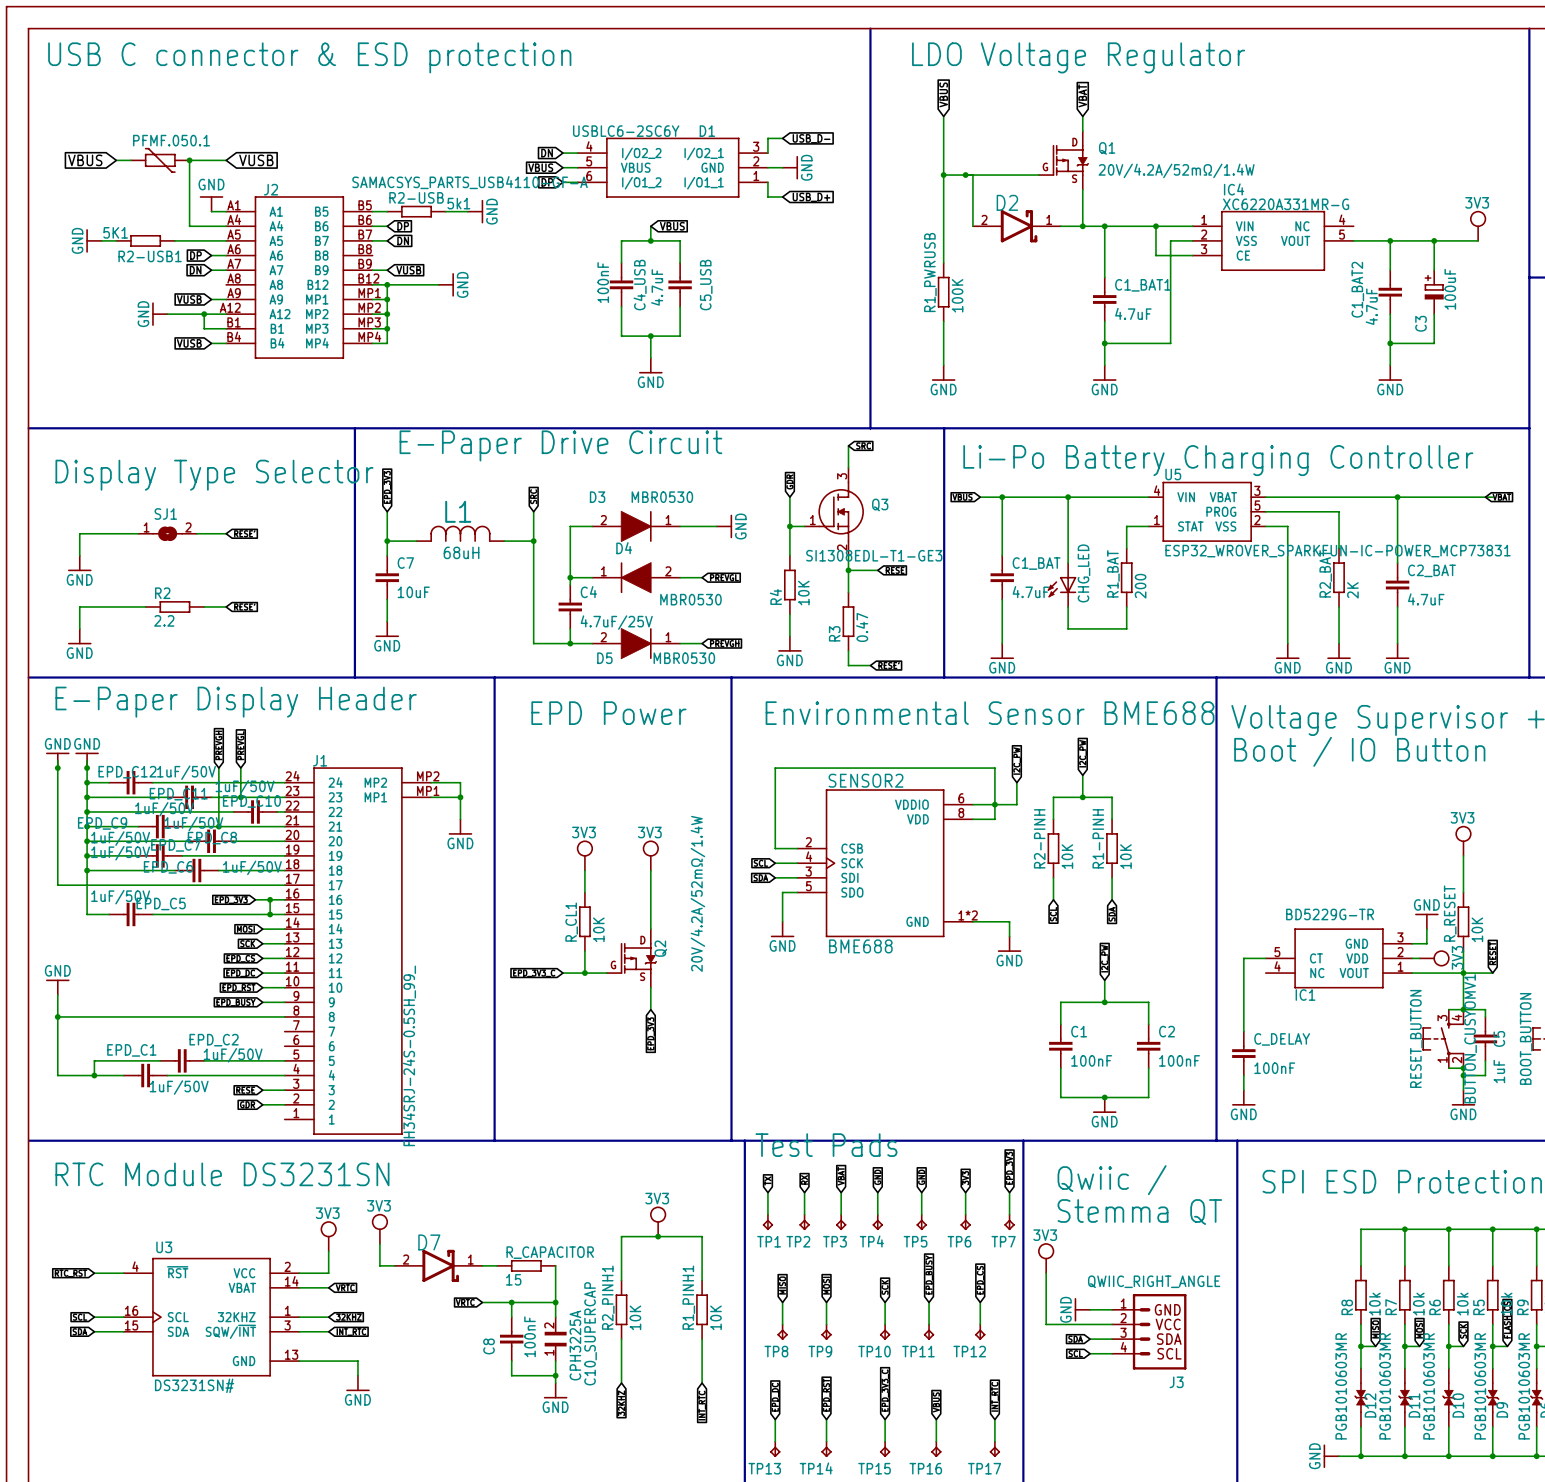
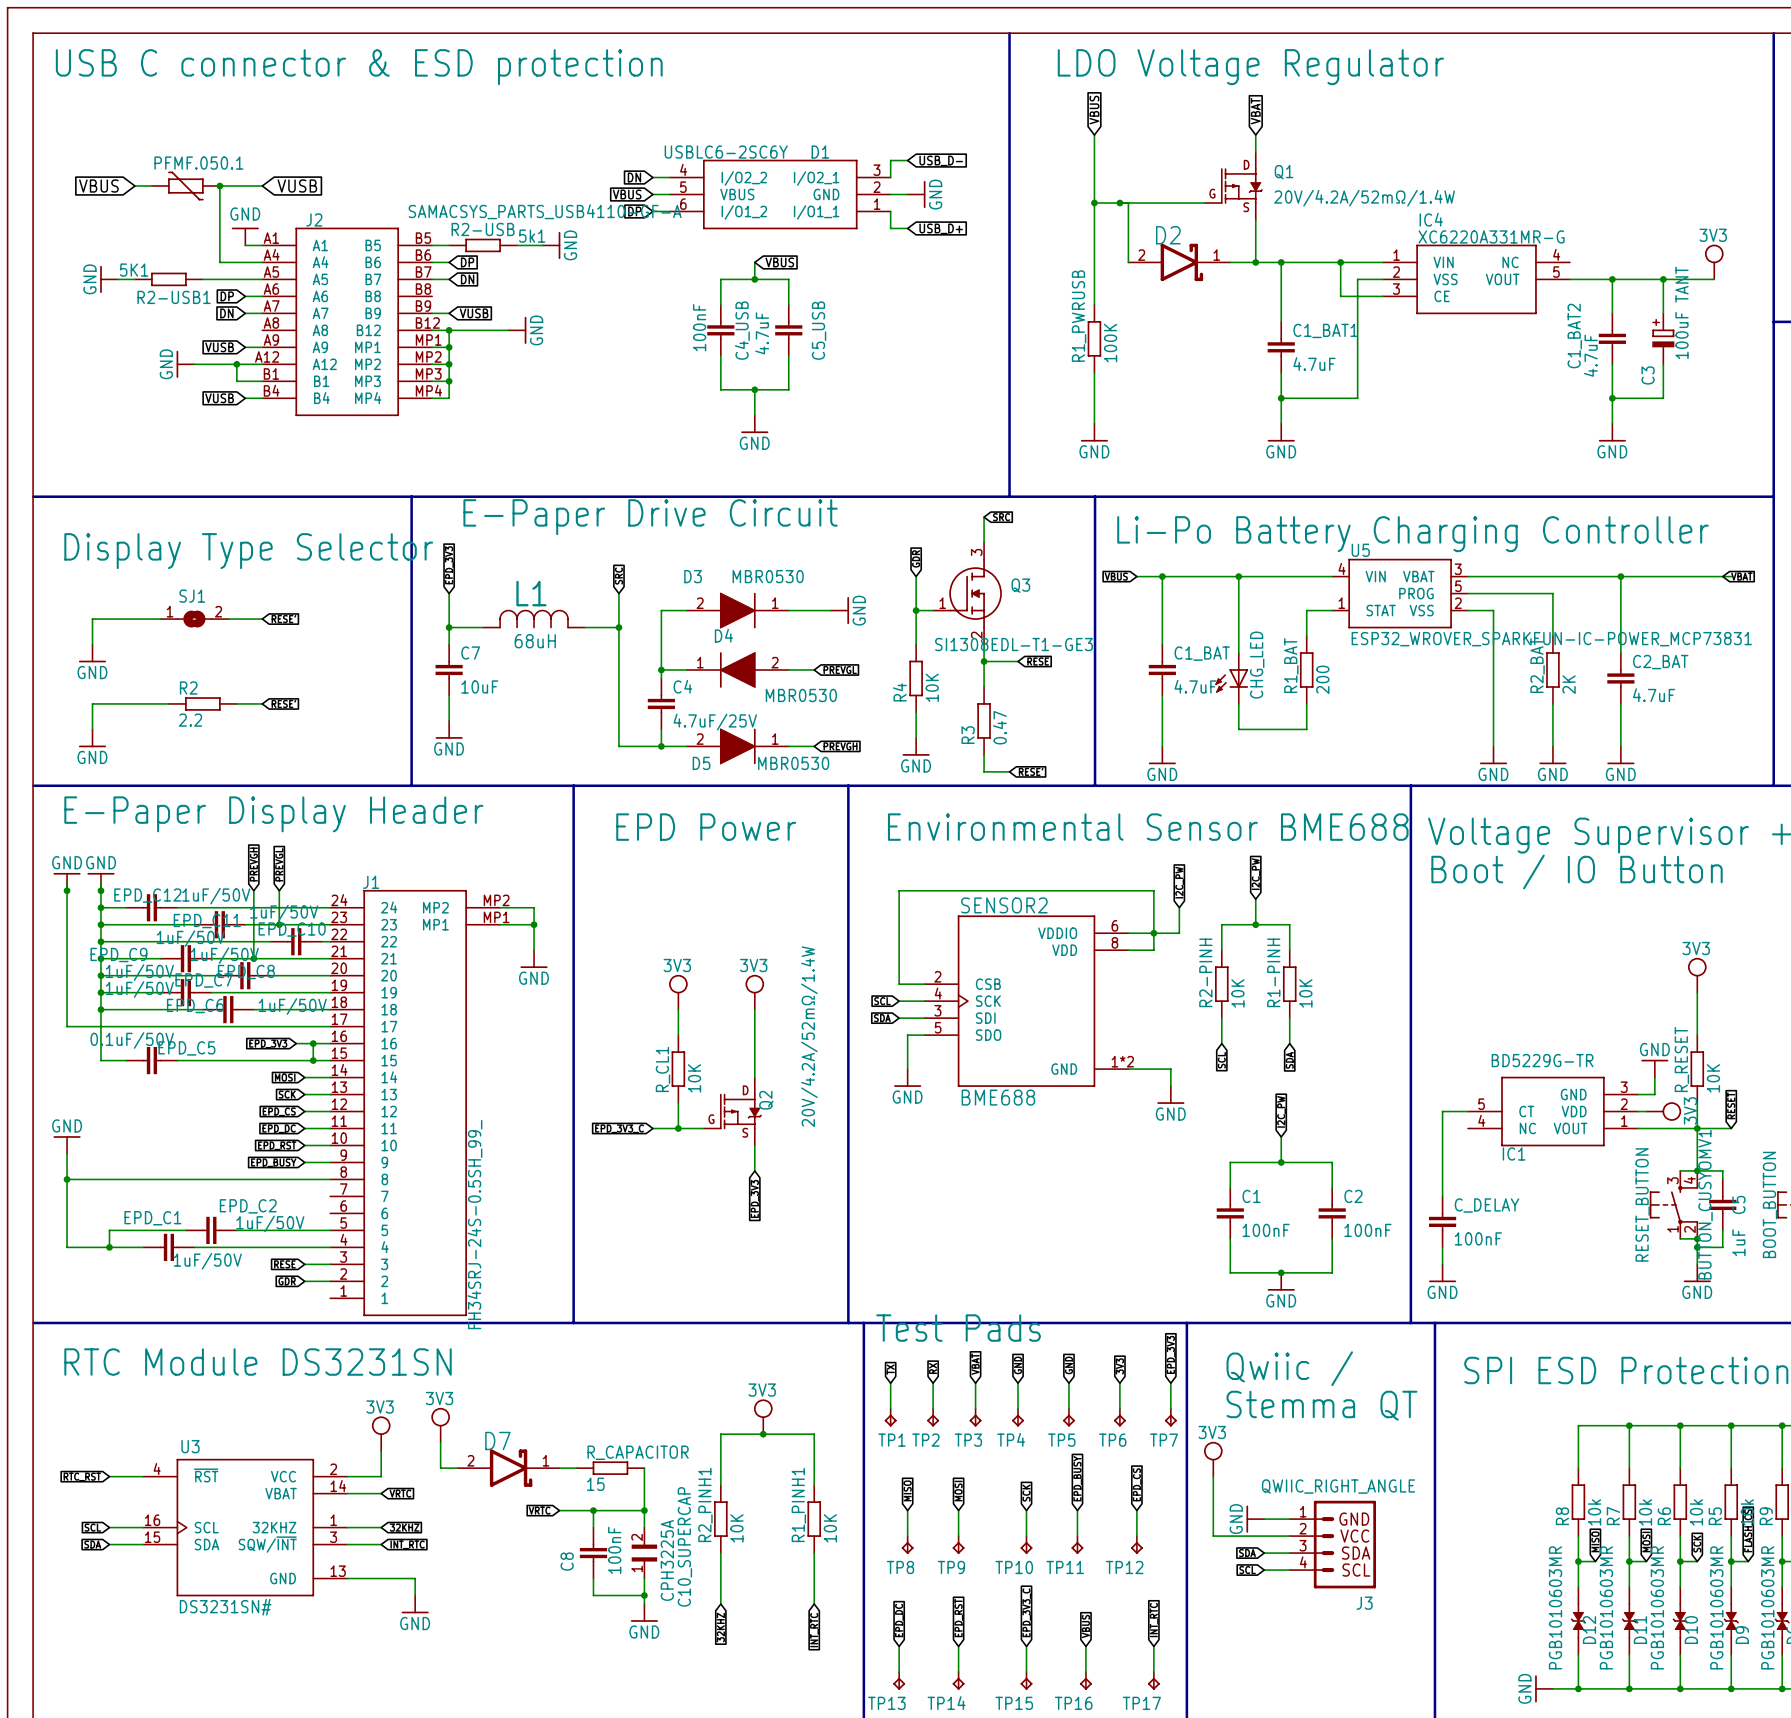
C3 value: 100uF (1450, 289) -> 100uF TANT (1682, 312)
EPD_C5 value: 1uF/50V (120, 897) -> 0.1uF/50V (132, 1040)

